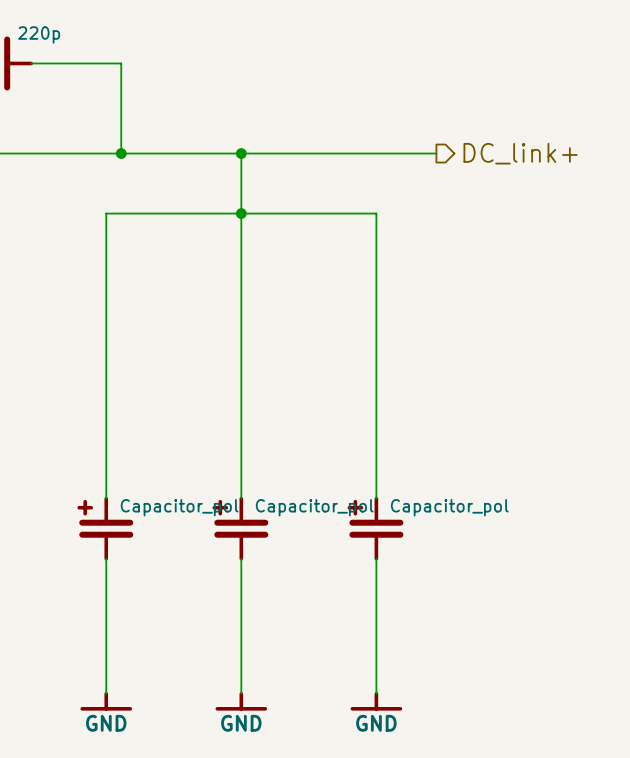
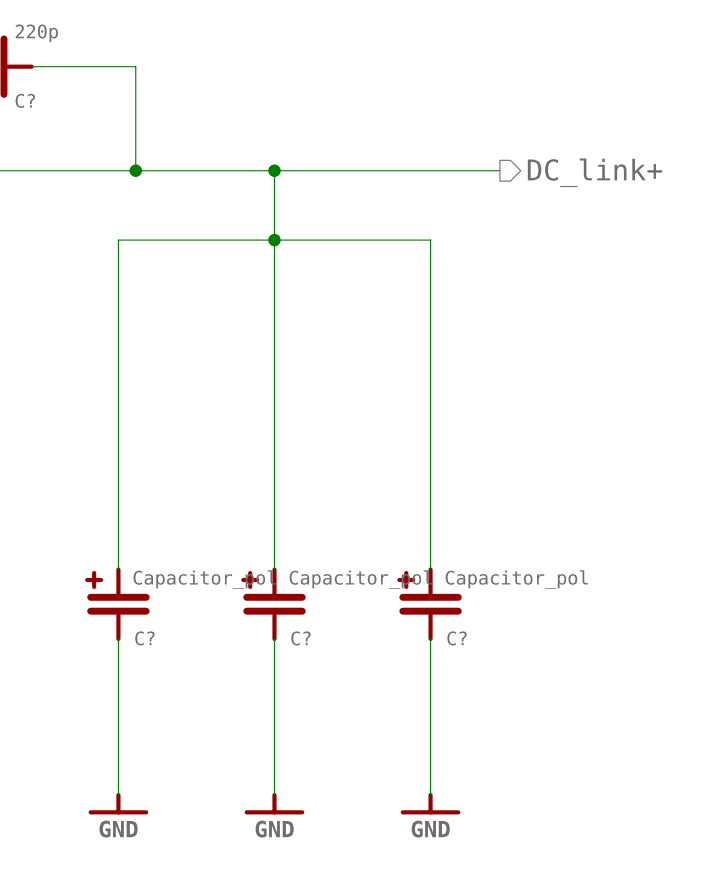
C? name: none -> C? (25, 100)
C? name: none -> C? (144, 638)
C? name: none -> C? (301, 638)
C? name: none -> C? (457, 638)

